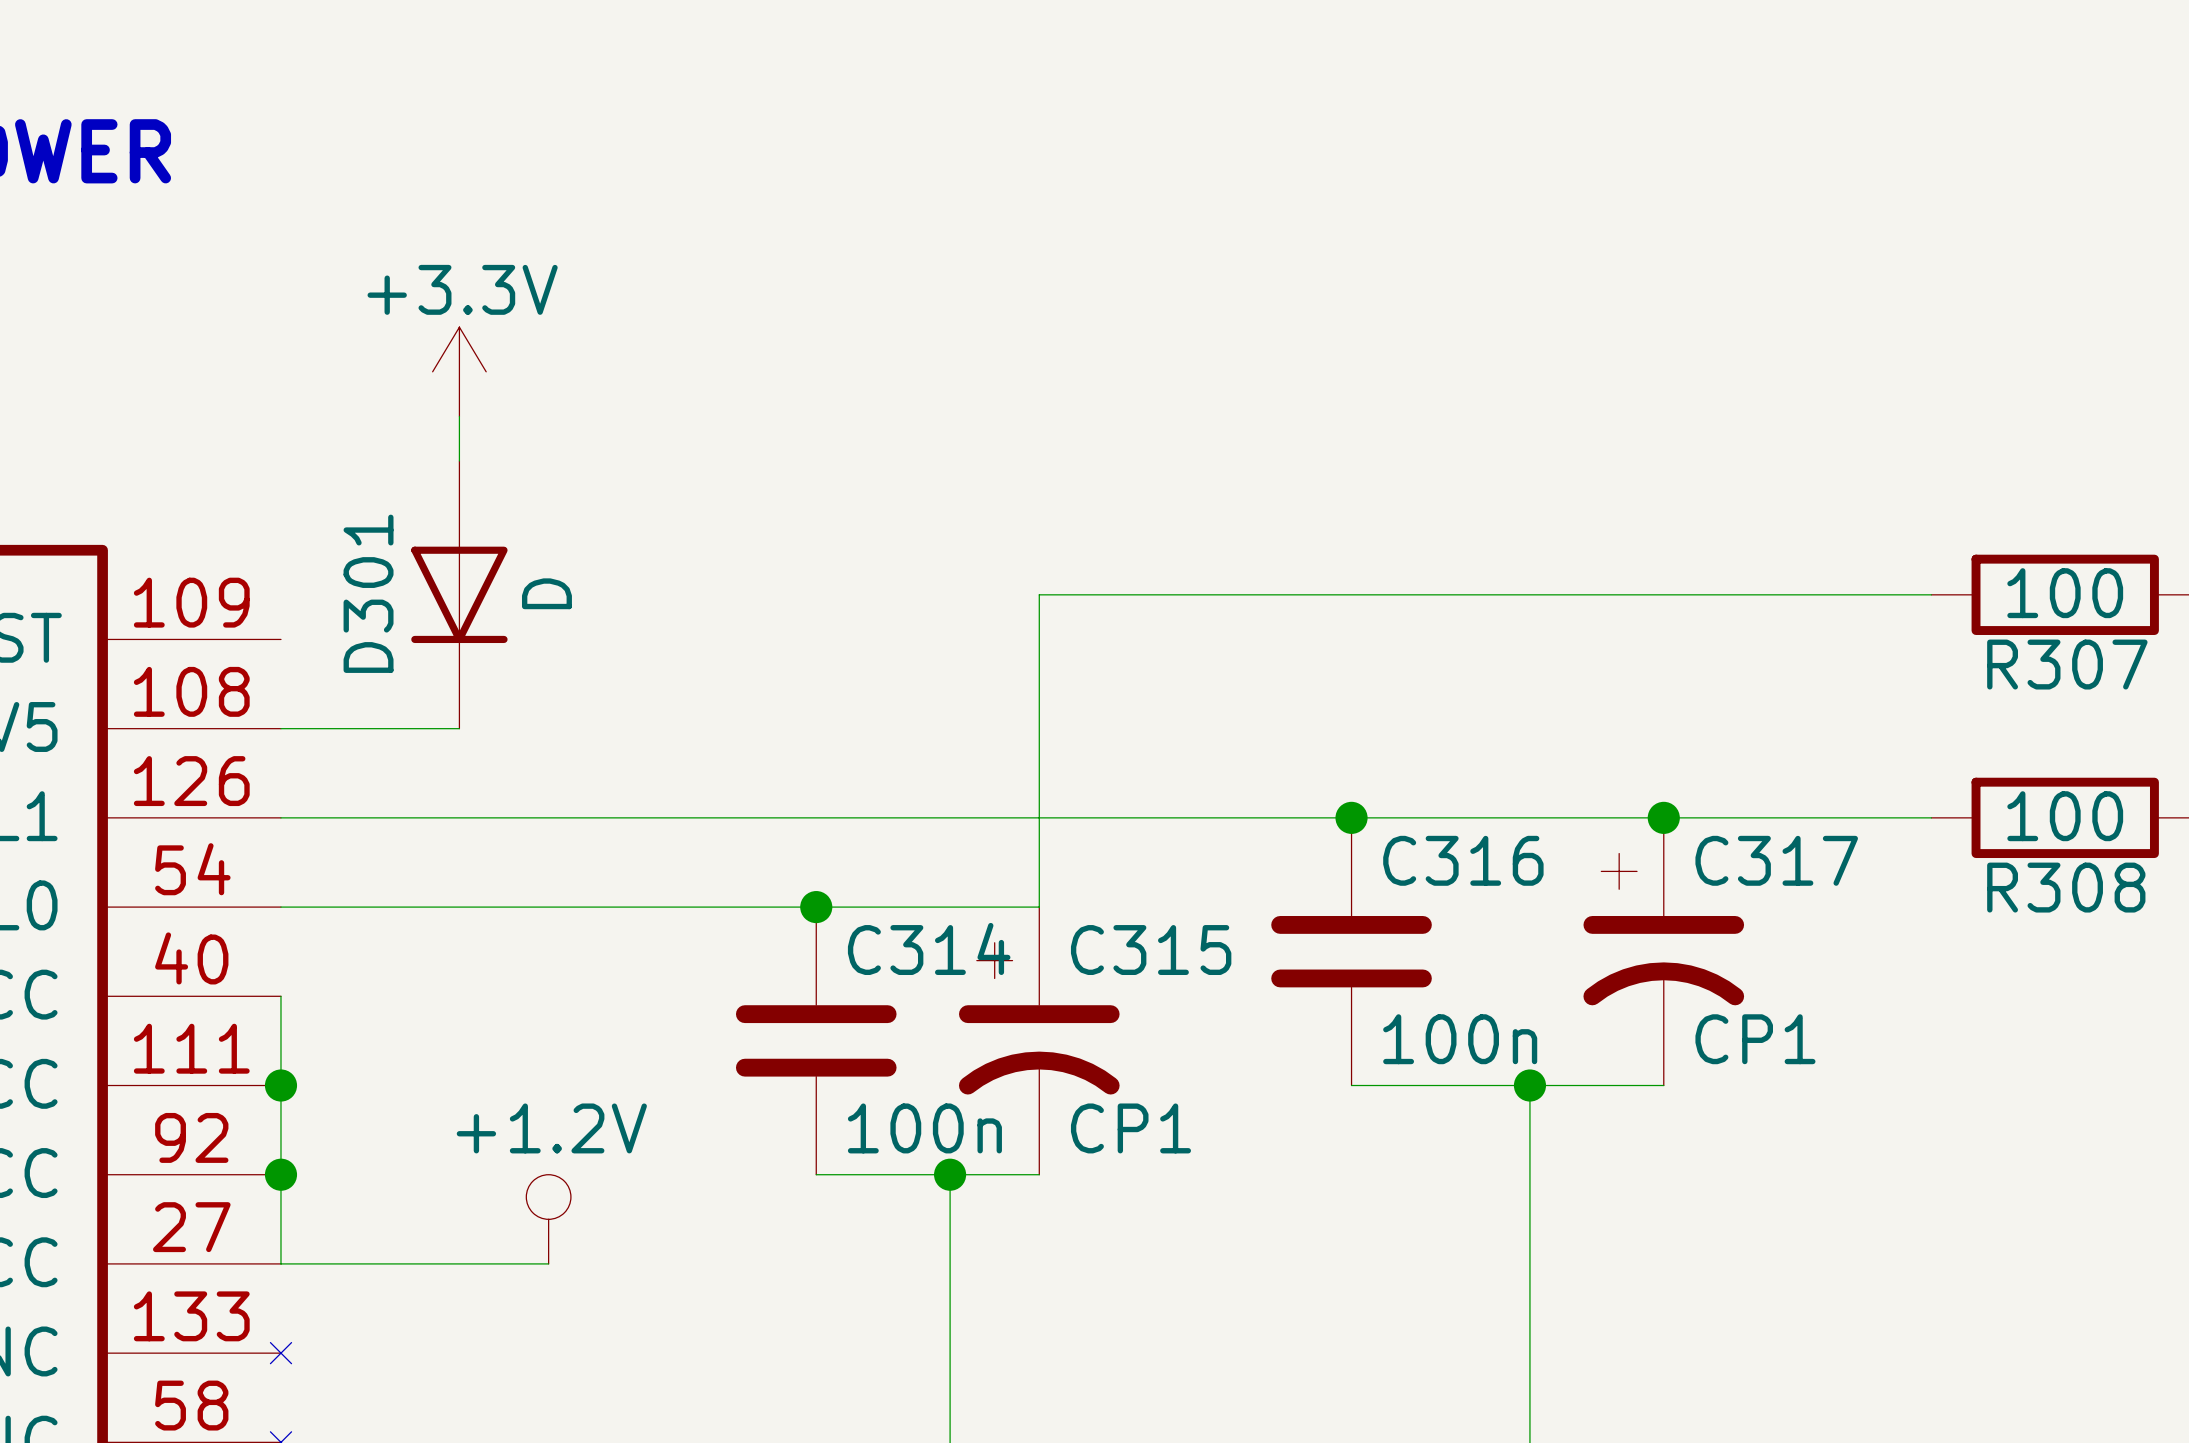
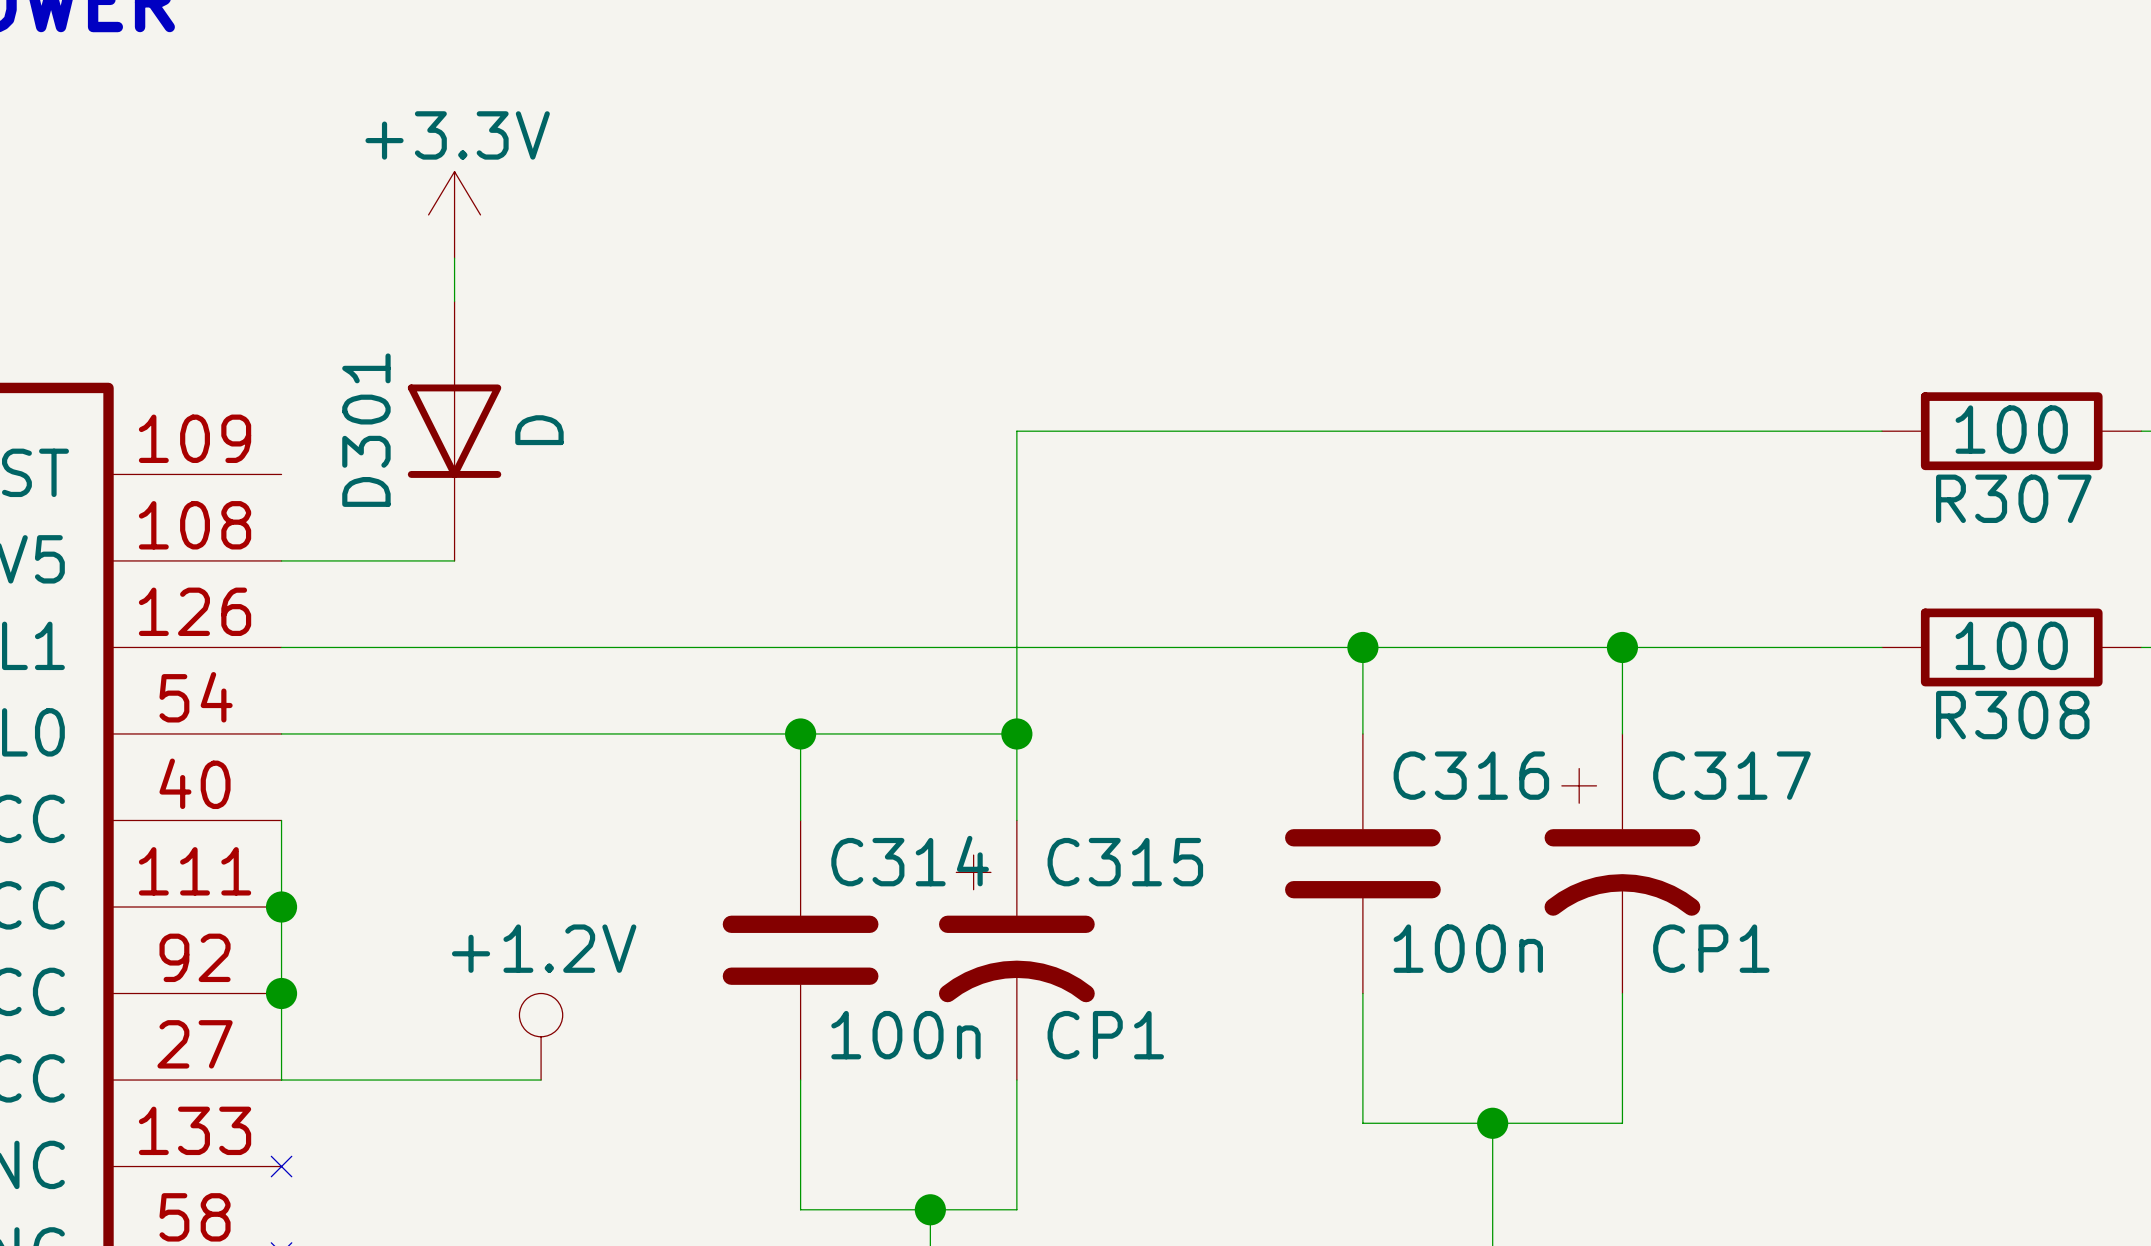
junction position: (1351, 817) -> (1362, 647)
wire: none -> (1362, 647) (1362, 733)
junction: none -> (1016, 733)
C316 position: (1351, 951) -> (1362, 863)
C317 position: (1663, 951) -> (1622, 863)
C314 position: (816, 1040) -> (800, 950)
C315 position: (1039, 1040) -> (1016, 950)
wire: (1351, 1085) (1663, 1085) -> none
wire: (1529, 1085) (1529, 1308) -> none
junction: (1529, 1085) -> none
wire: (816, 1174) (1039, 1174) -> none
wire: (950, 1174) (950, 1397) -> none
junction: (950, 1174) -> none
wire: none -> (1362, 993) (1362, 1123) (1622, 1123) (1622, 993)
wire: none -> (800, 1080) (800, 1209) (1016, 1209) (1016, 1080)
junction: none -> (1492, 1123)
junction: none -> (930, 1209)

